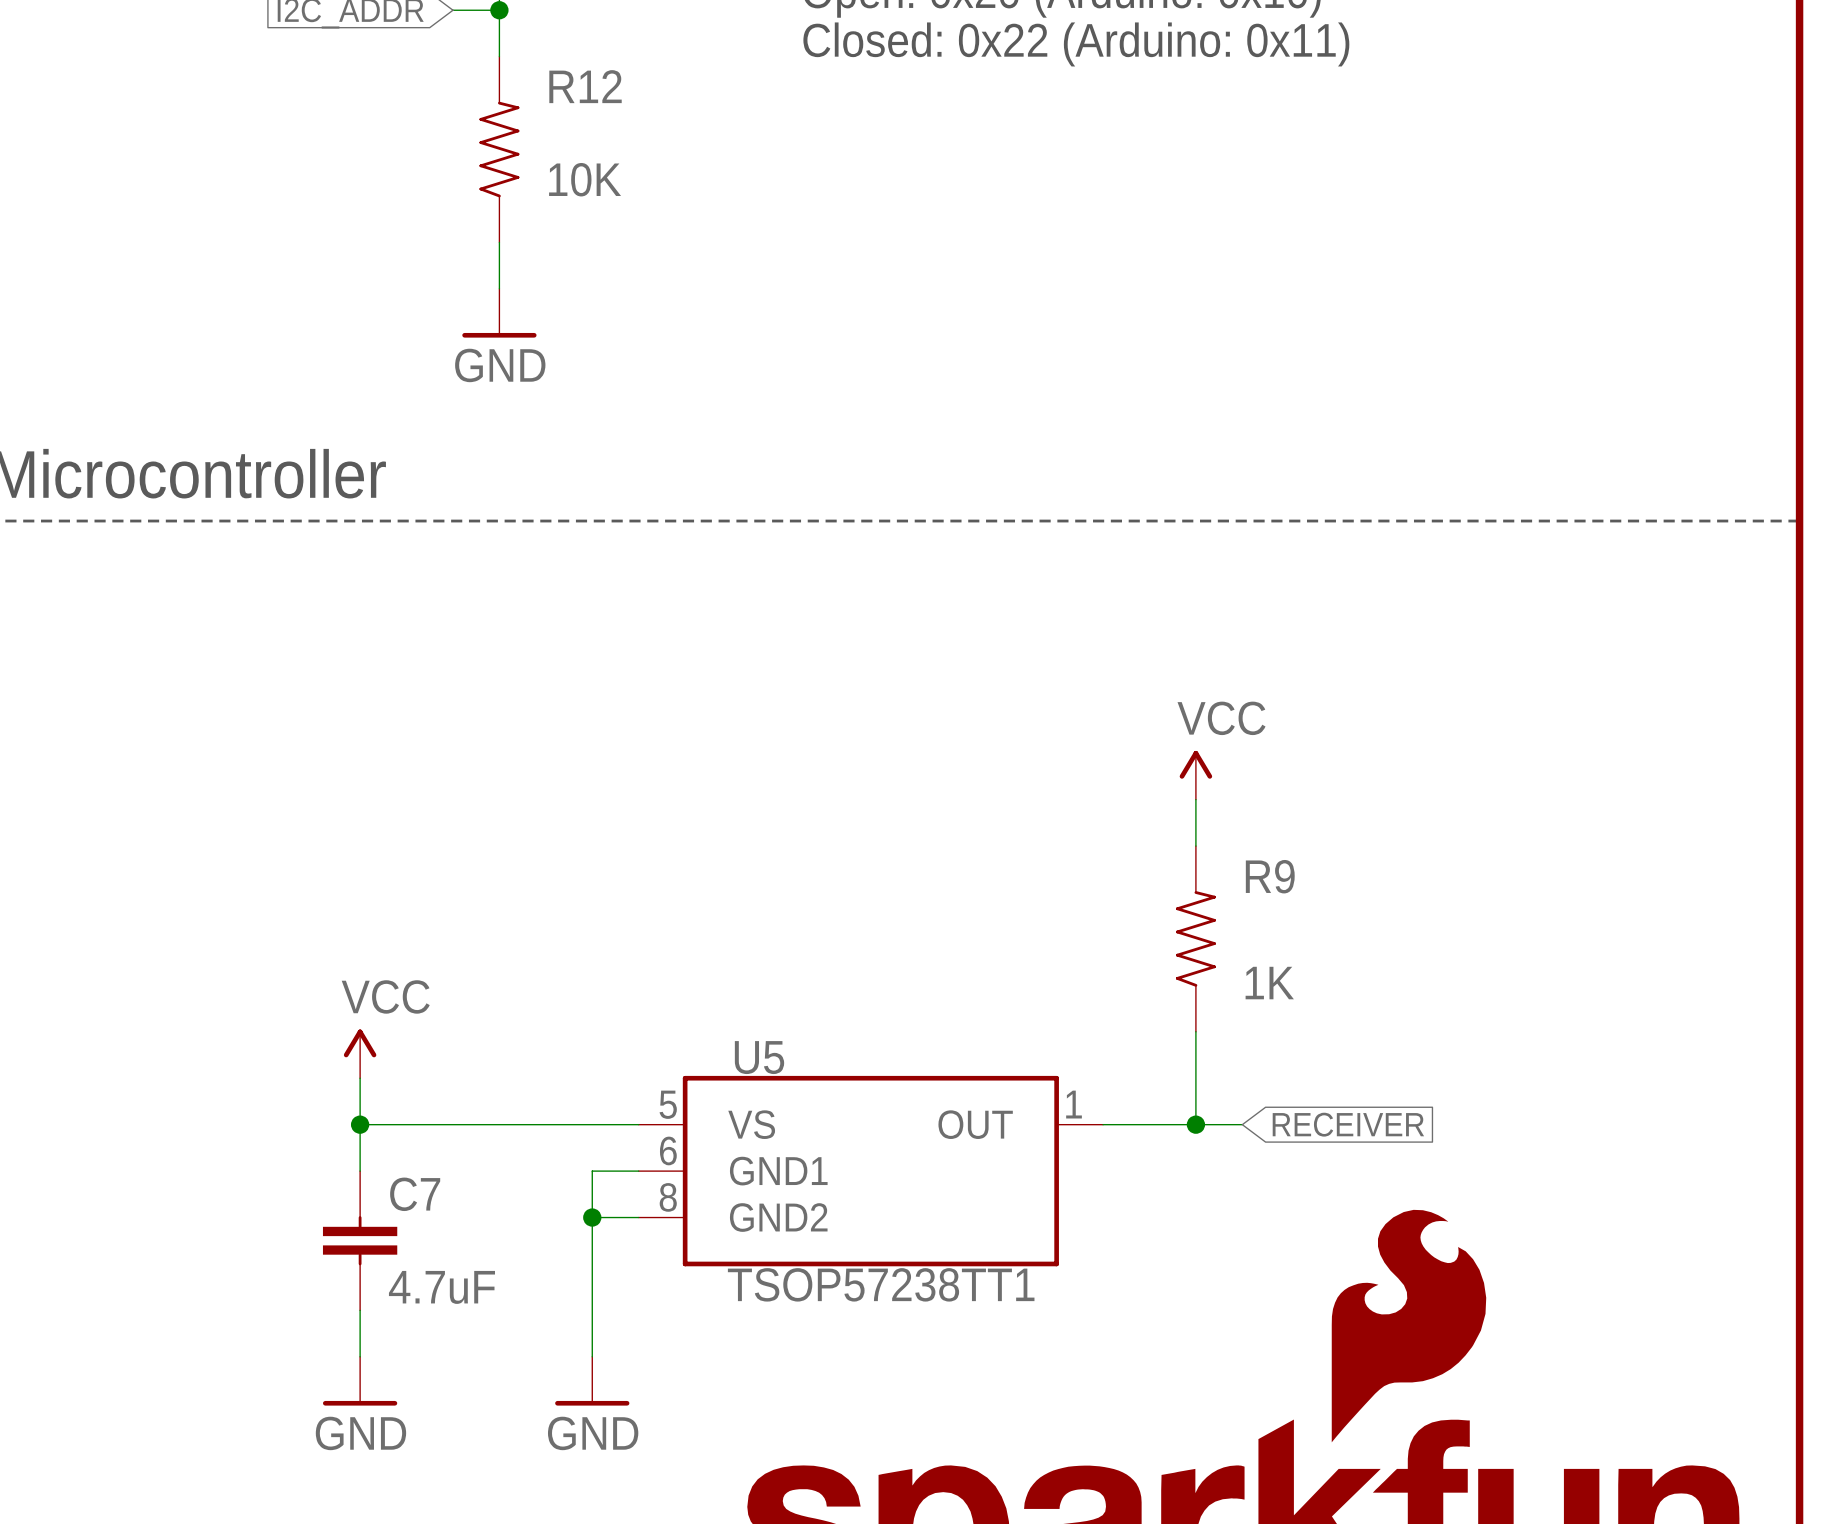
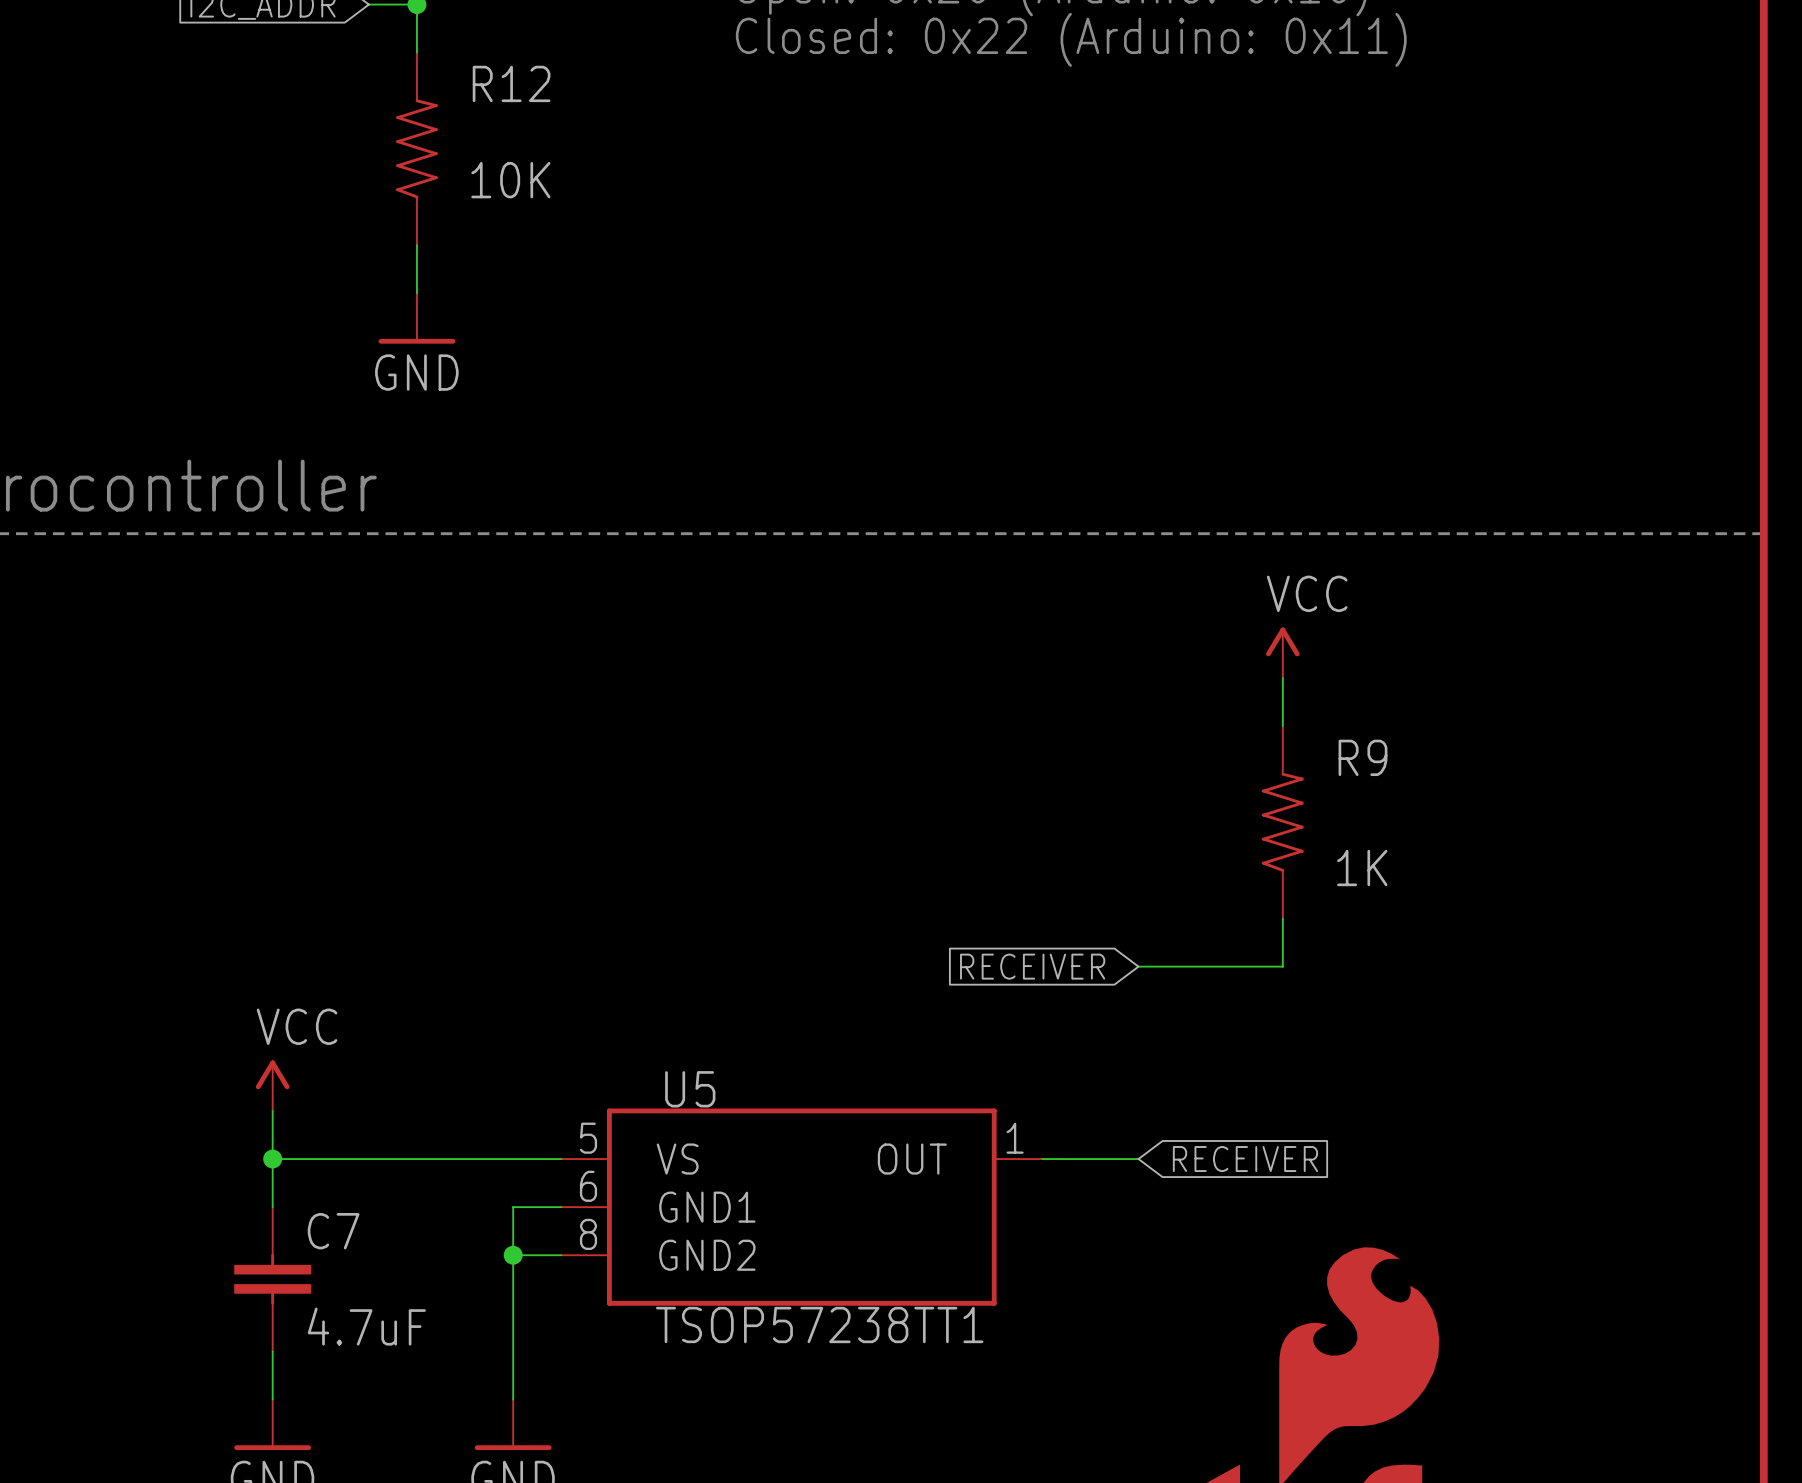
power symbol position: VCC (1195, 775) -> VCC (1282, 652)
wire: (1195, 799) (1195, 846) -> (1282, 678) (1282, 726)
wire: none -> (1282, 918) (1282, 966) (1138, 966)
global label: none -> RECEIVER (1032, 966)
R9 position: (1195, 938) -> (1282, 822)
wire: (1195, 1031) (1195, 1124) (1242, 1124) -> none
junction: (1195, 1124) -> none
global label position: RECEIVER (1348, 1124) -> RECEIVER (1245, 1159)

